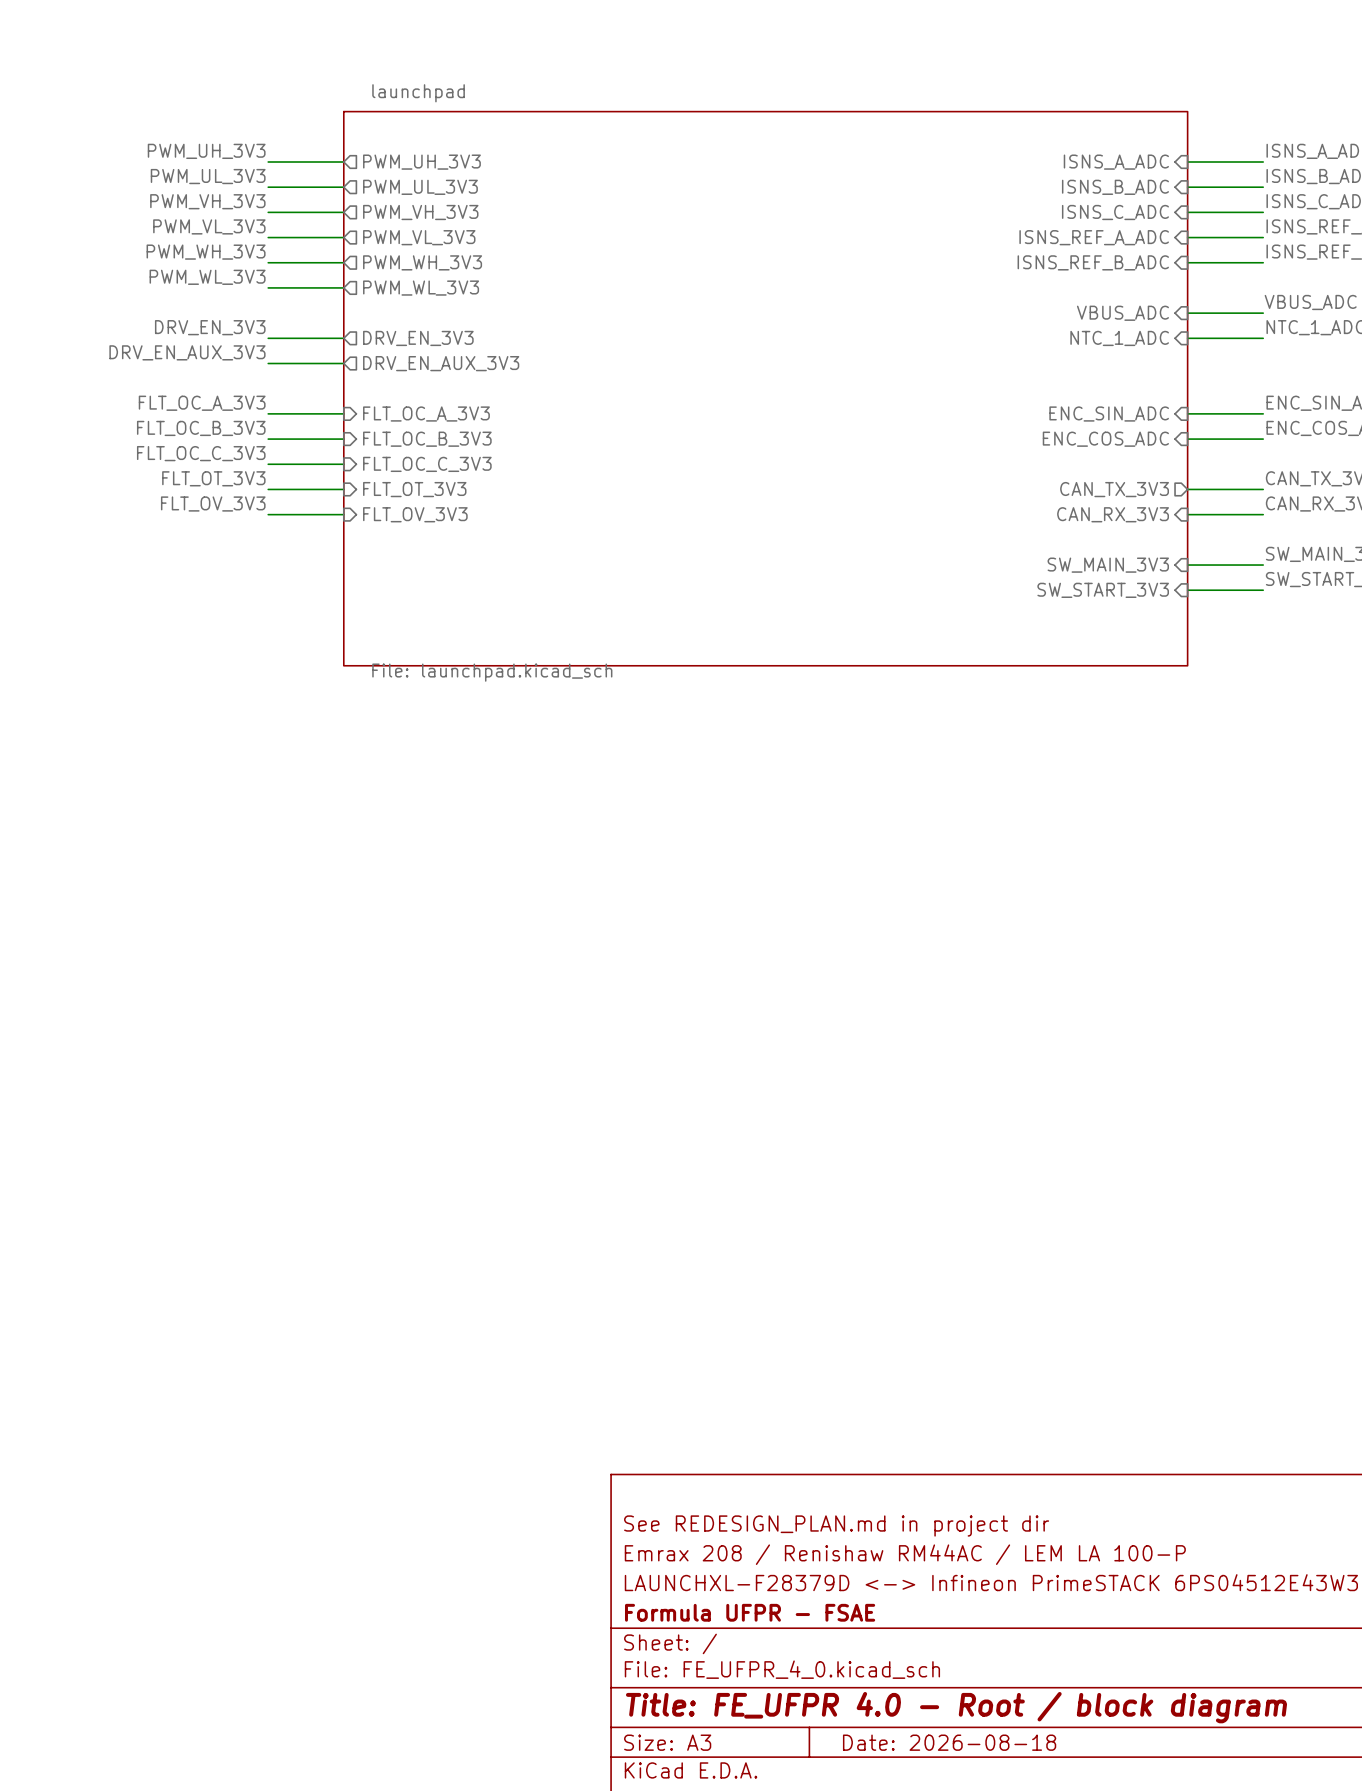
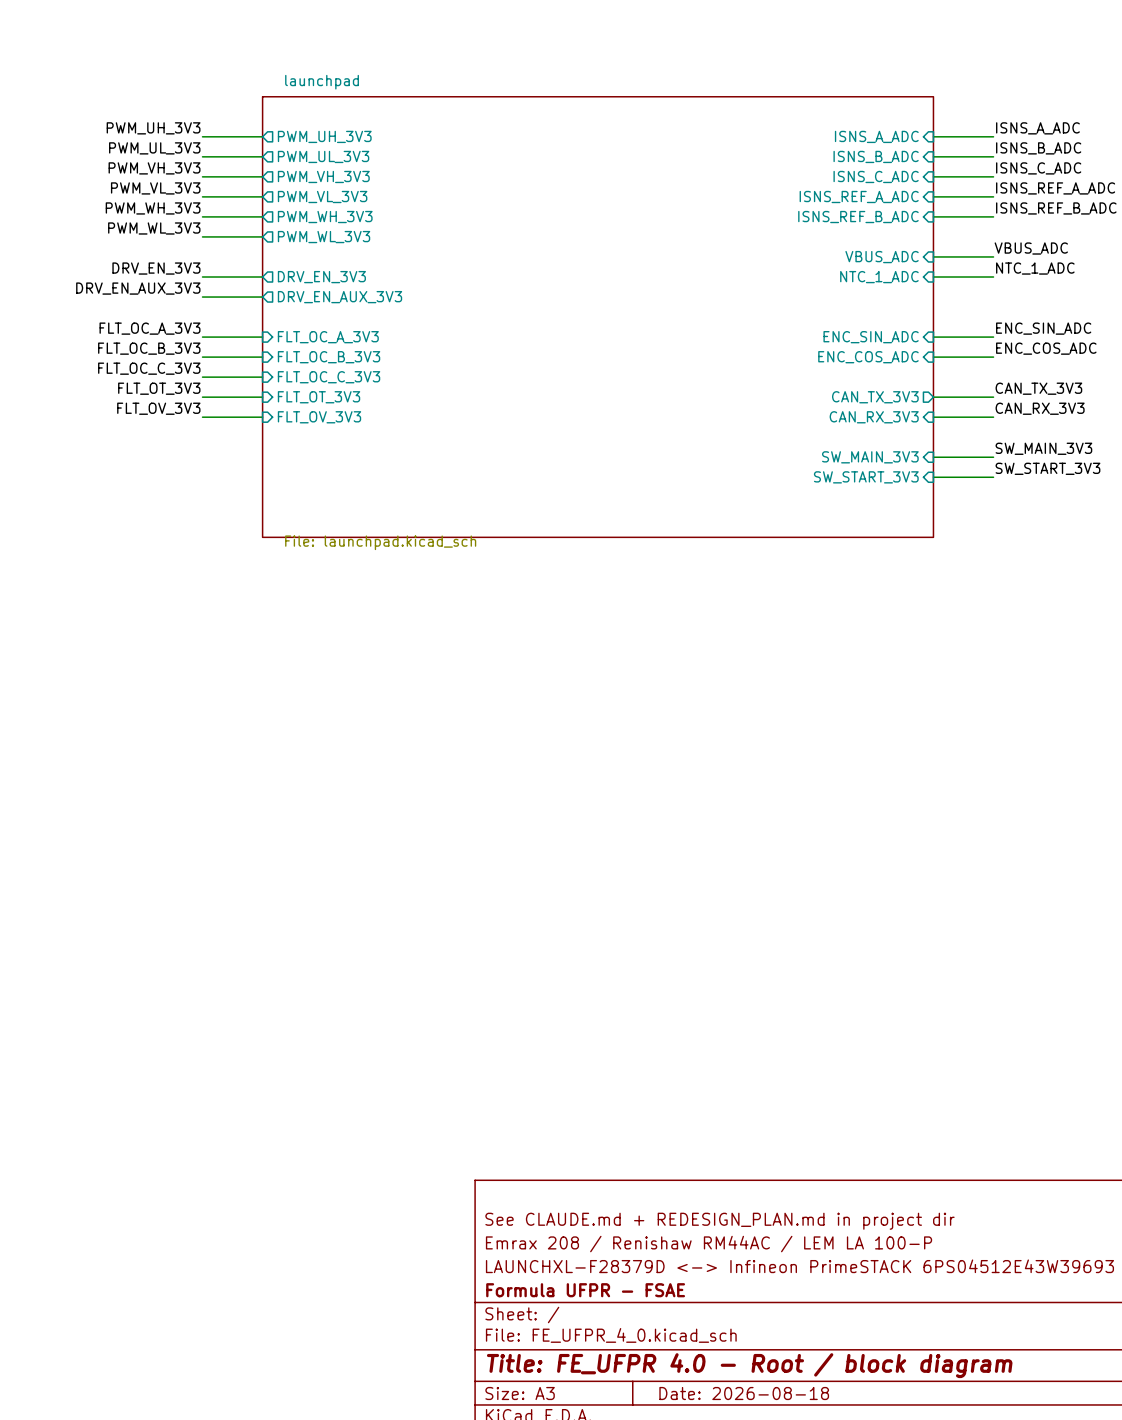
title block: See REDESIGN_PLAN.md in project dir (836, 1526) -> See CLAUDE.md + REDESIGN_PLAN.md in project dir (719, 1221)

